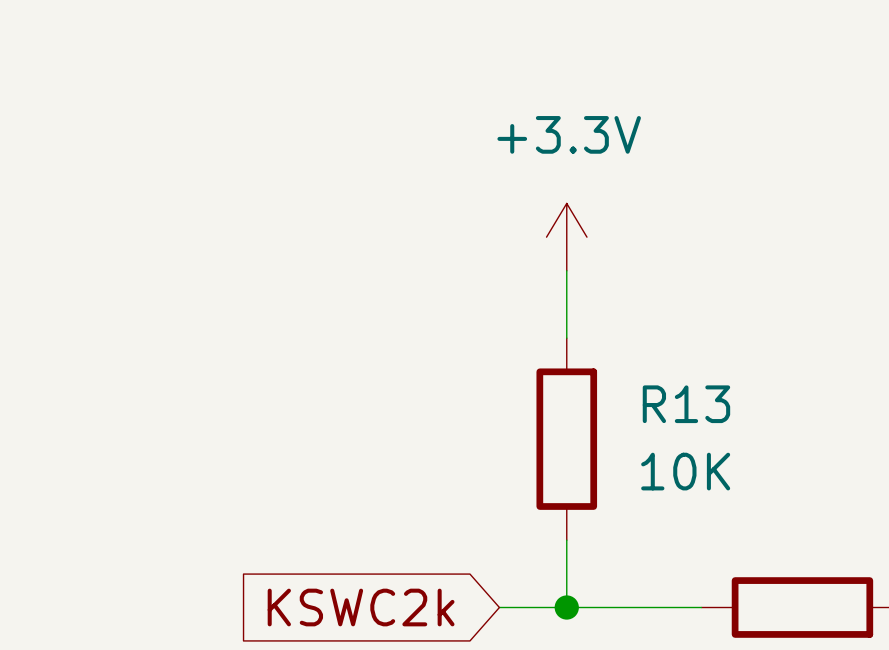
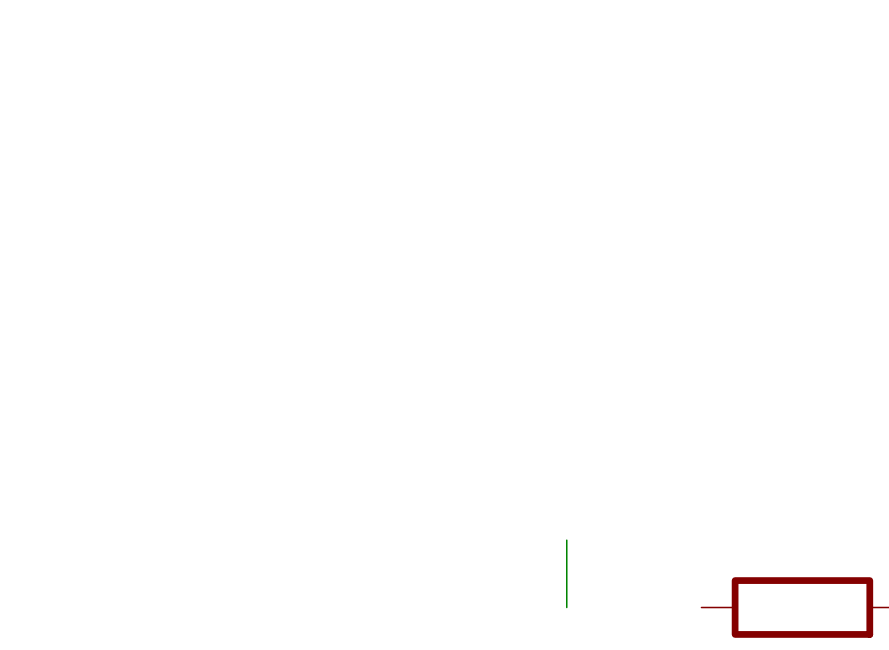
power symbol: +3.3V (566, 237) -> none
wire: (566, 270) (566, 338) -> none
R13: 10K (566, 439) -> none
global label: KSWC2k (361, 607) -> none
wire: (499, 607) (701, 607) -> none
junction: (566, 607) -> none

